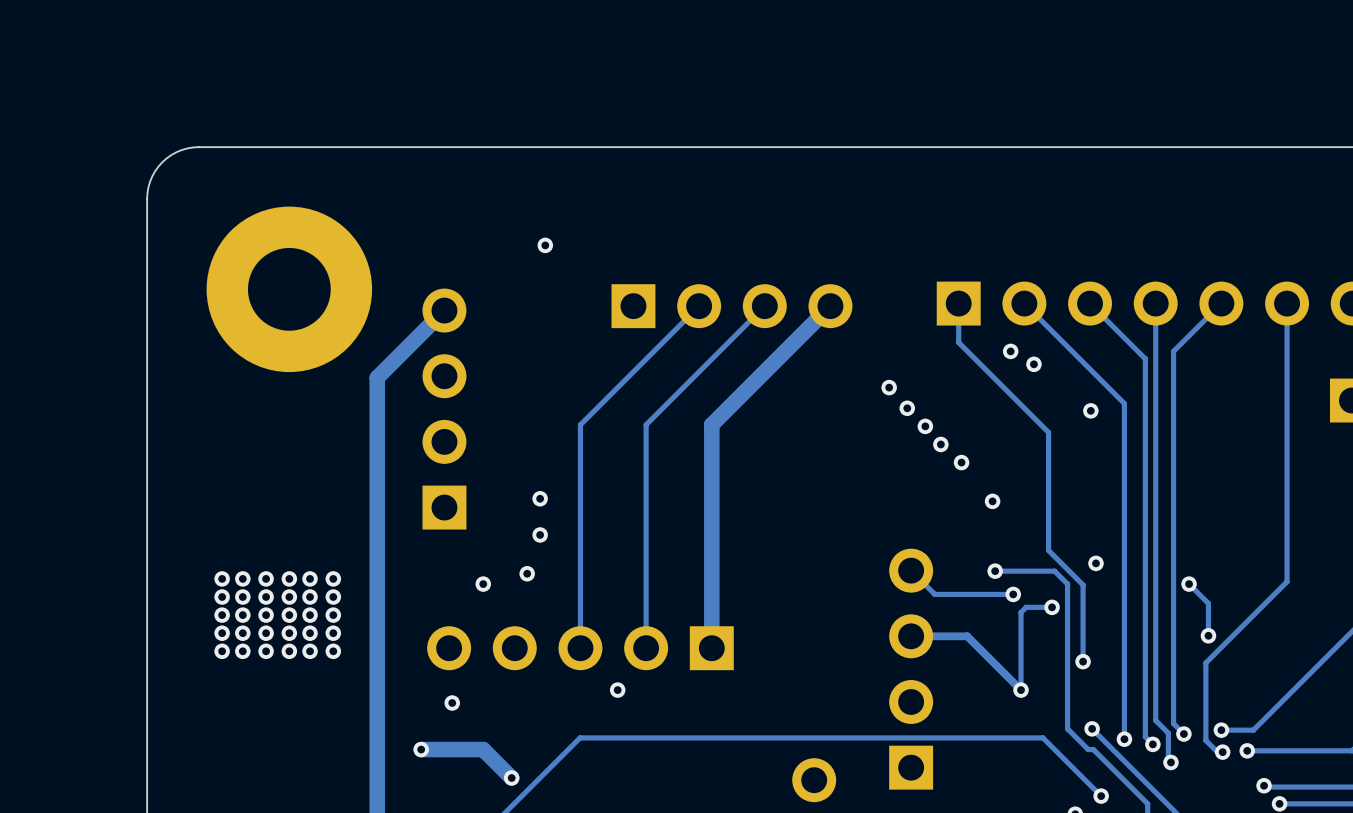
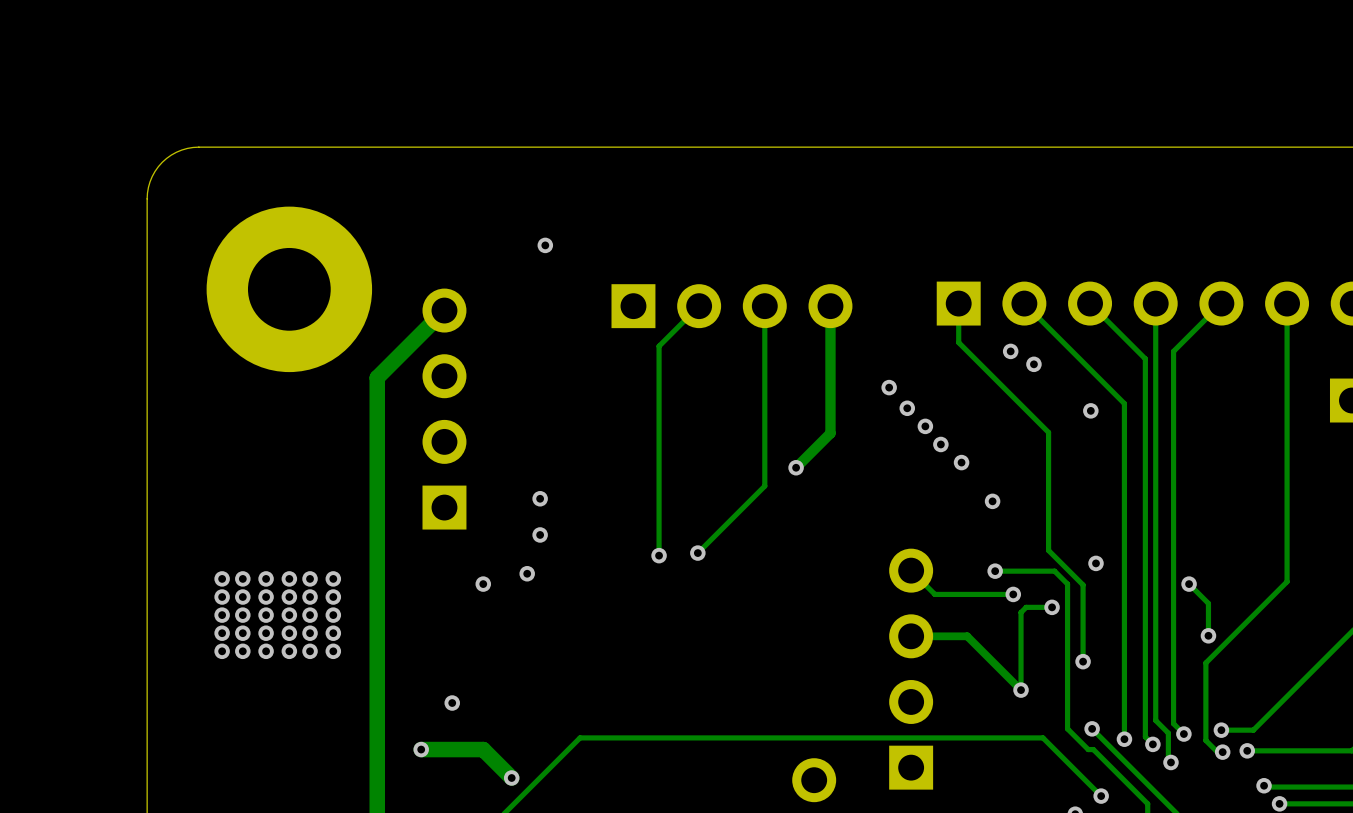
track: (764, 306) (646, 424) (646, 648) -> (764, 306) (764, 486) (697, 553)
track: (830, 306) (711, 424) (711, 648) -> (830, 306) (830, 433) (796, 467)
track: (659, 346) (580, 424) (580, 648) -> (659, 346) (659, 555)
via: none -> (796, 467)
via: none -> (697, 553)
via: none -> (659, 555)
part: (580, 648) -> none
via: (617, 690) -> none

